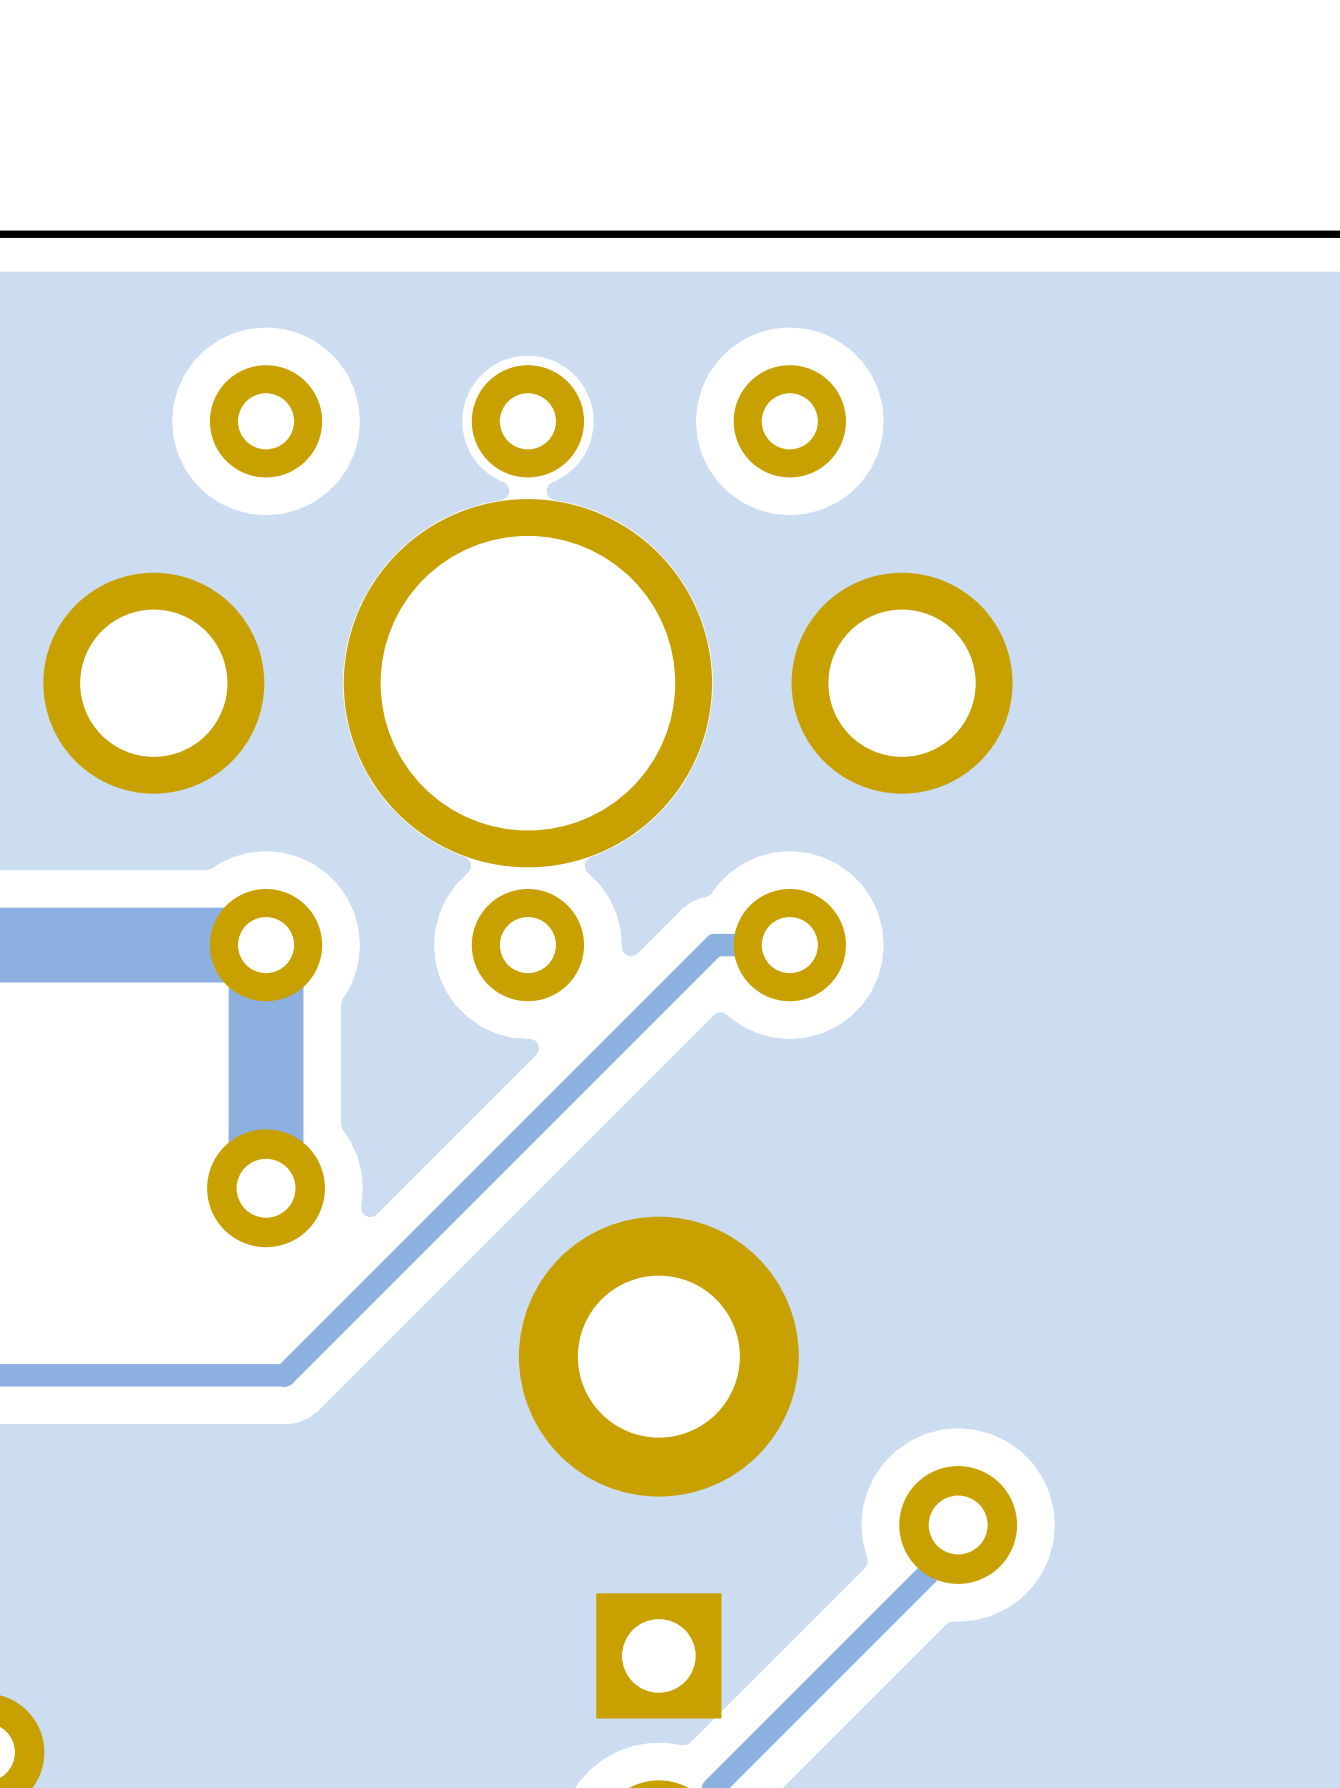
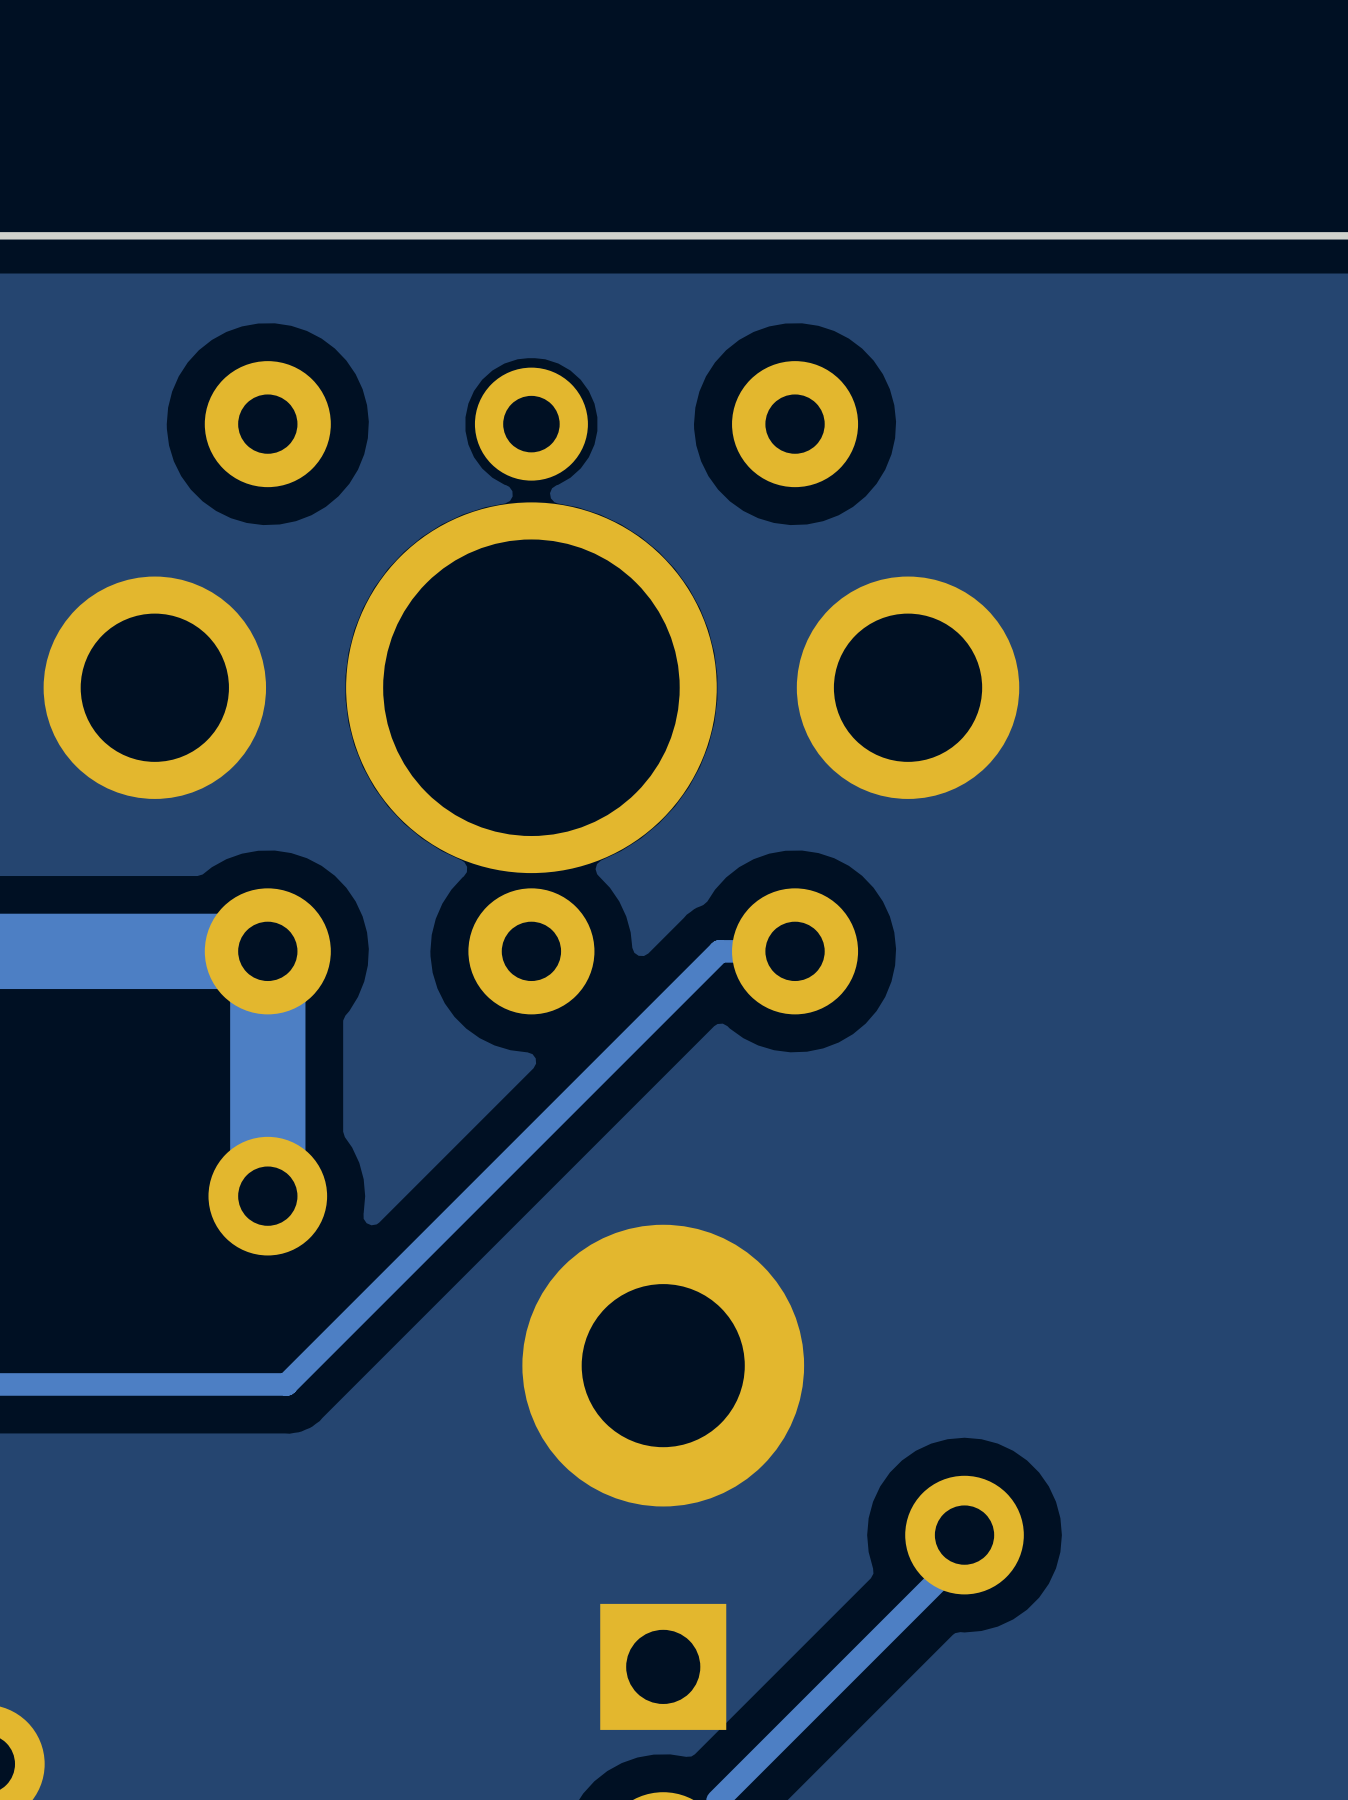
part footprint: [43, 365, 1013, 1002] -> [43, 361, 1020, 1015]

